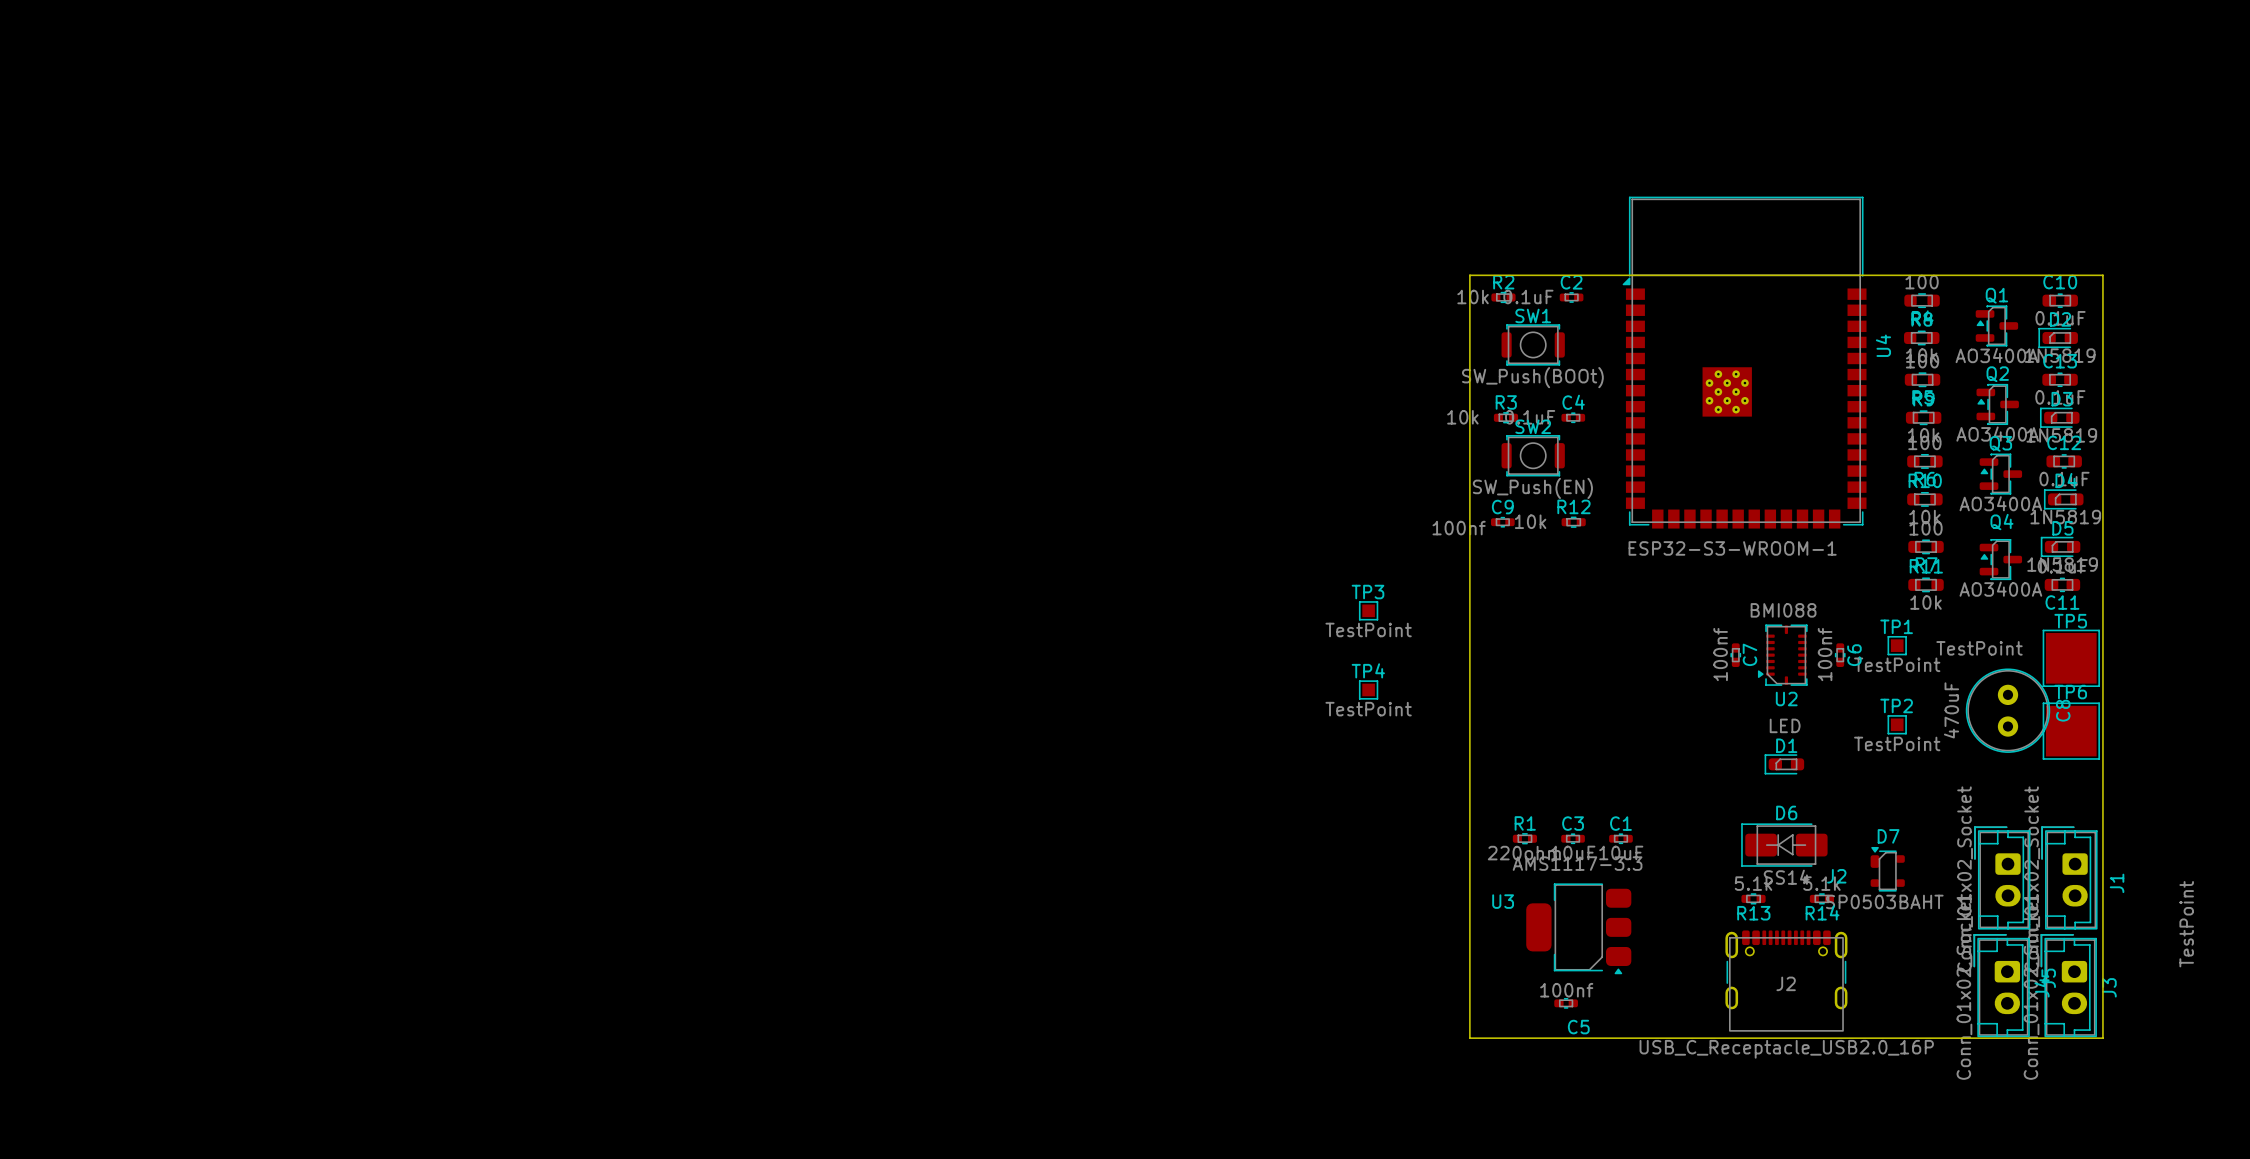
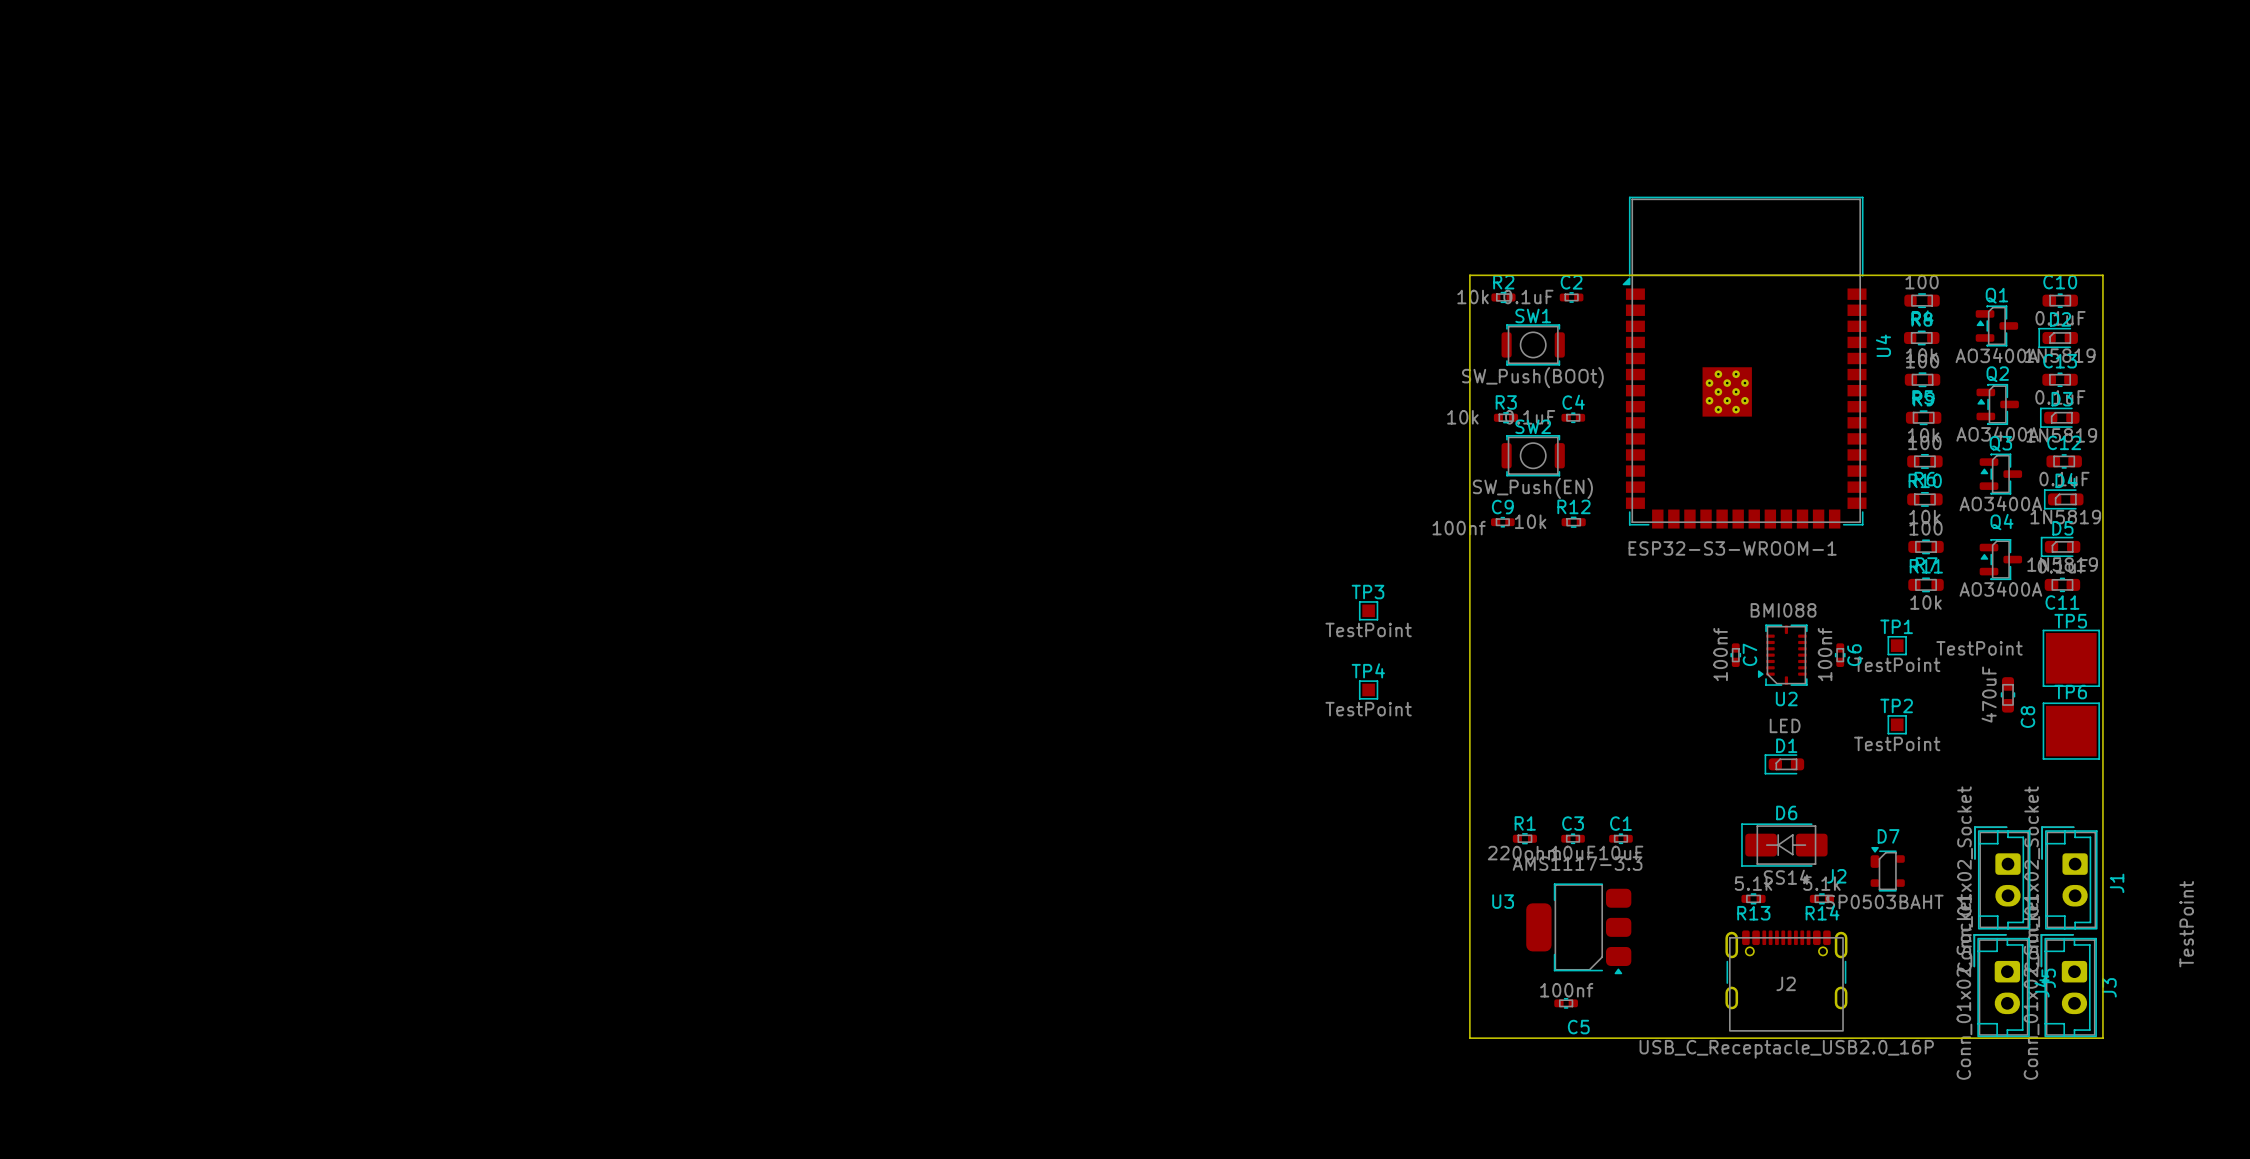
C8 footprint: [1965, 668, 2051, 753] -> [2000, 677, 2016, 713]
C8 value position: 470uF (1951, 710) -> 470uF (1989, 694)
C8 name position: C8 (2063, 710) -> C8 (2027, 717)

